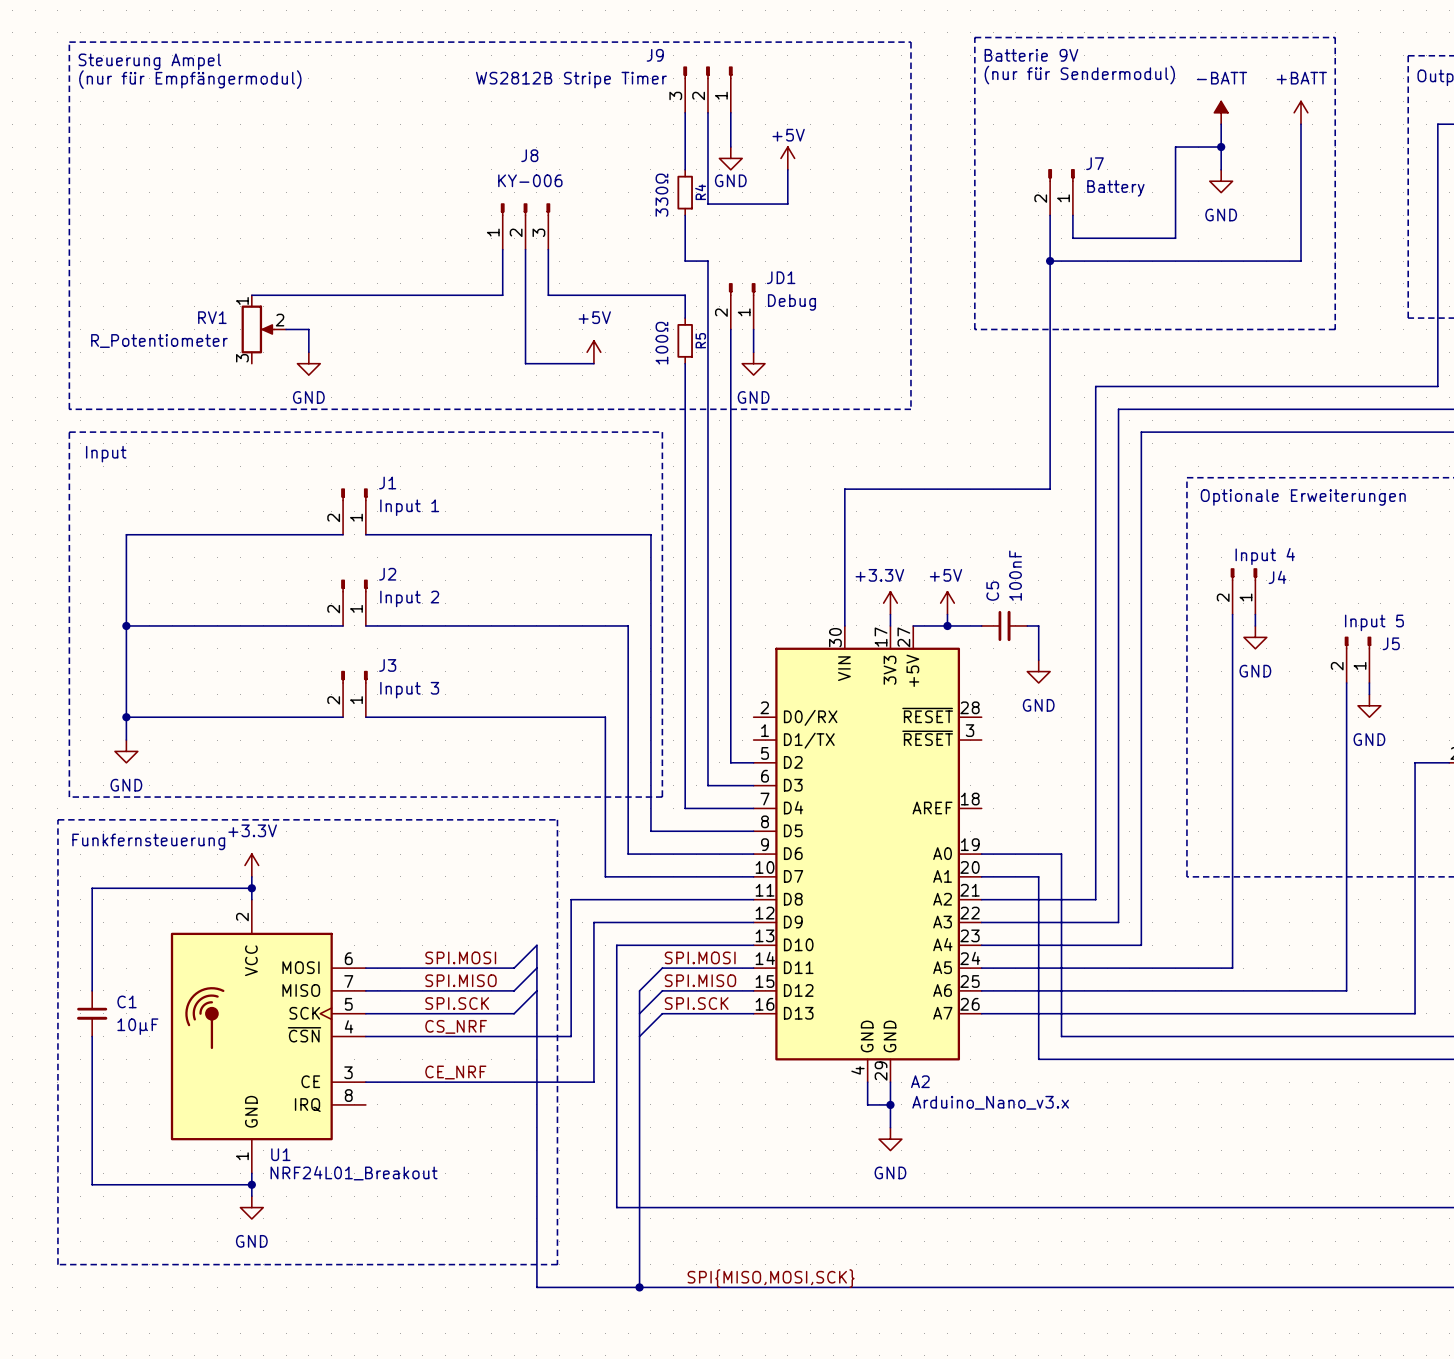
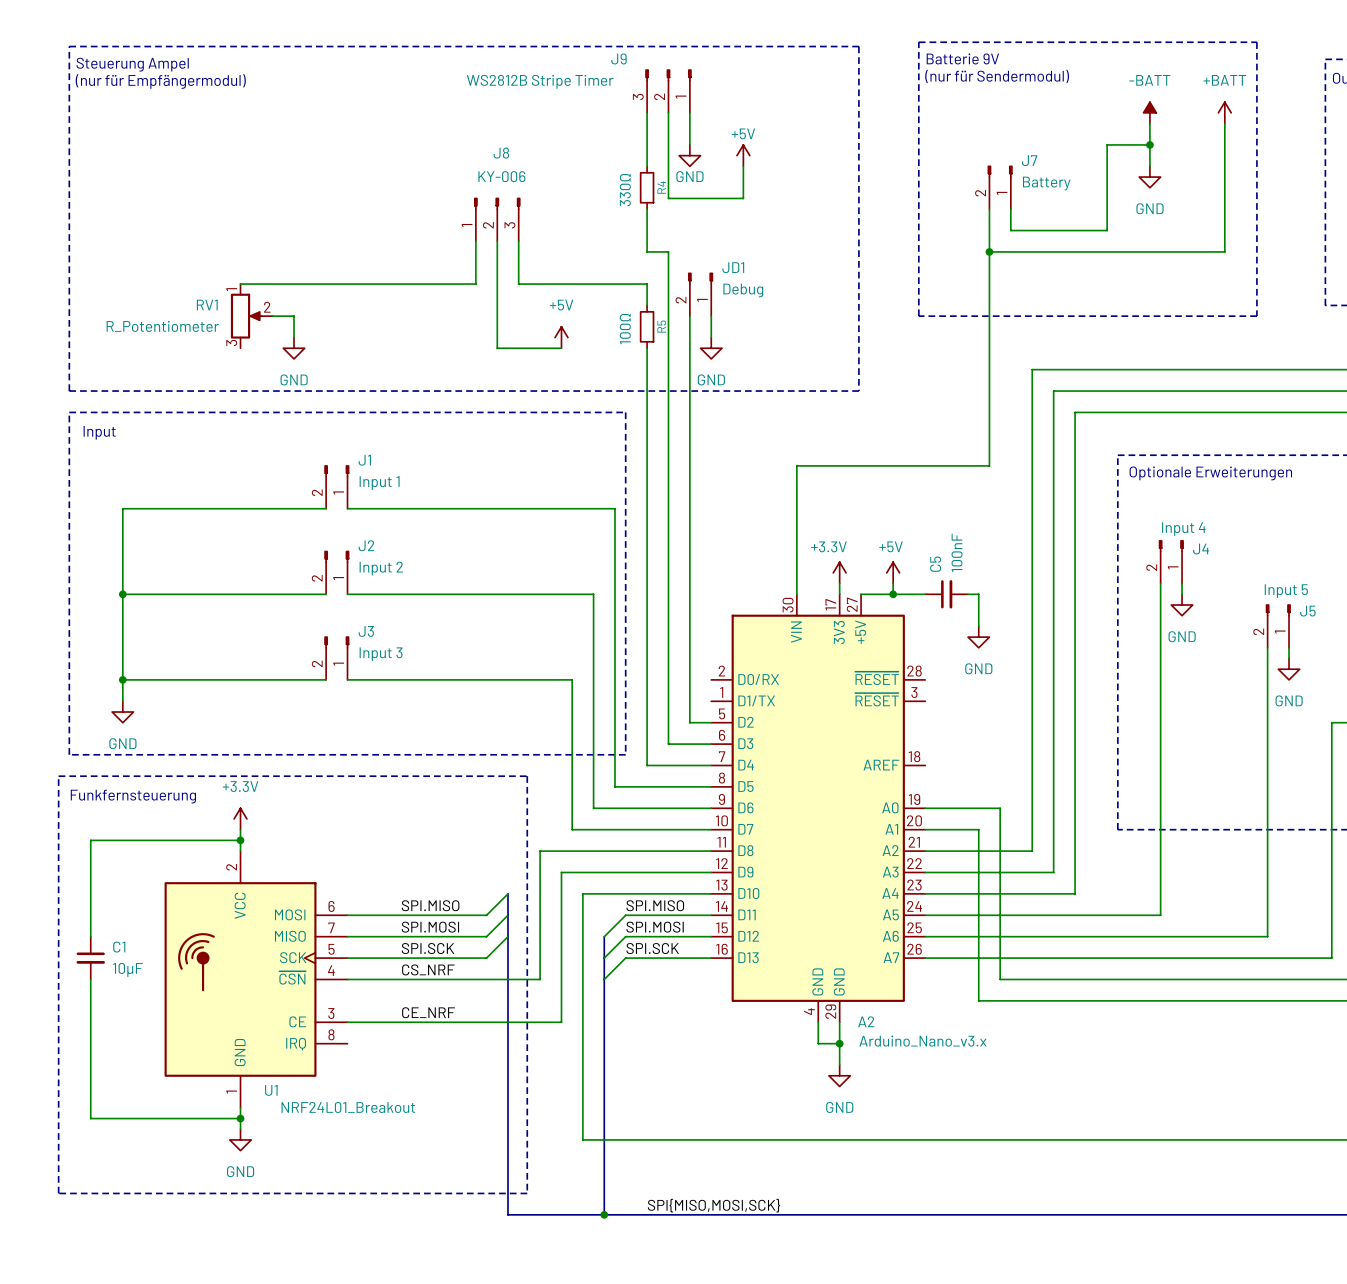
label: SPI.MOSI (460, 957) -> SPI.MISO (430, 905)
label: SPI.MOSI (700, 957) -> SPI.MISO (655, 905)
label: SPI.MISO (460, 980) -> SPI.MOSI (430, 927)
label: SPI.MISO (700, 980) -> SPI.MOSI (655, 927)

